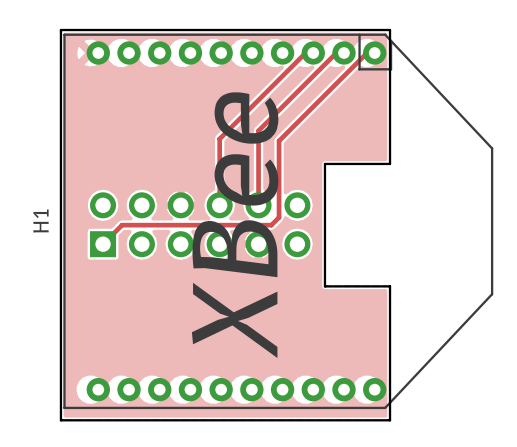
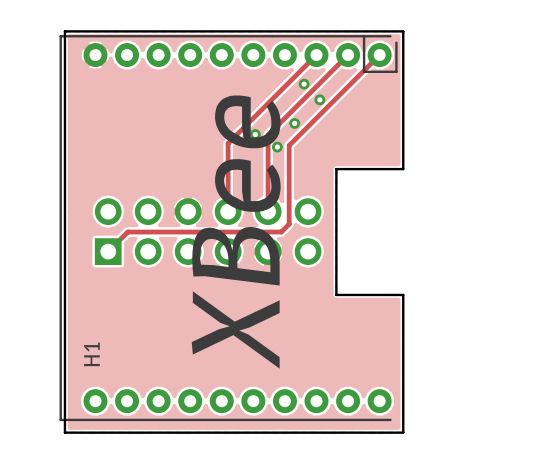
H1 footprint: [63, 33, 494, 410] -> [59, 35, 398, 422]
part: none -> (304, 84)
part: none -> (319, 99)
part: none -> (294, 123)
part: none -> (255, 134)
part: none -> (277, 147)
H1 name position: H1 (40, 221) -> H1 (91, 354)

